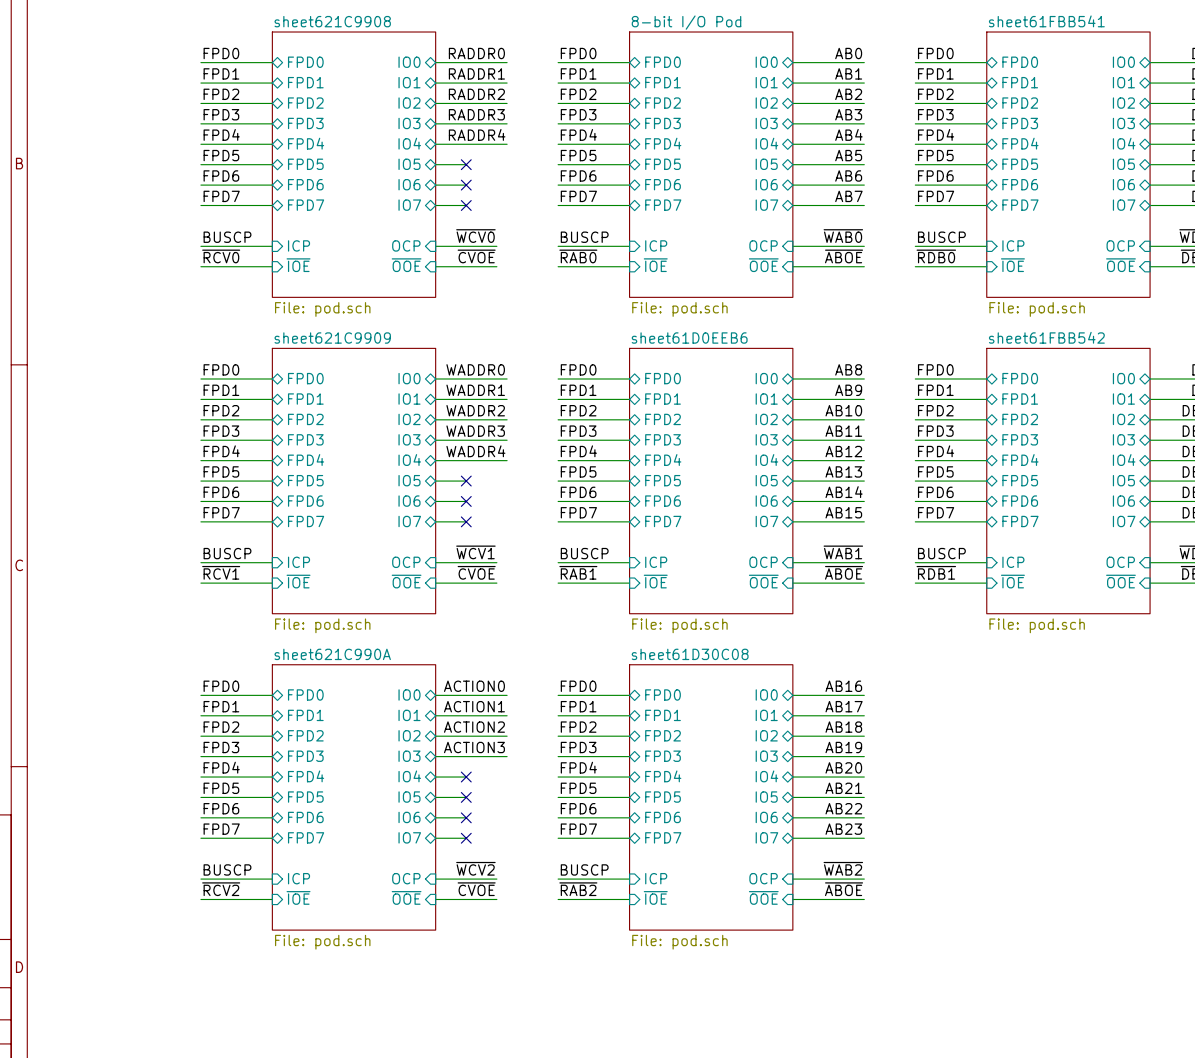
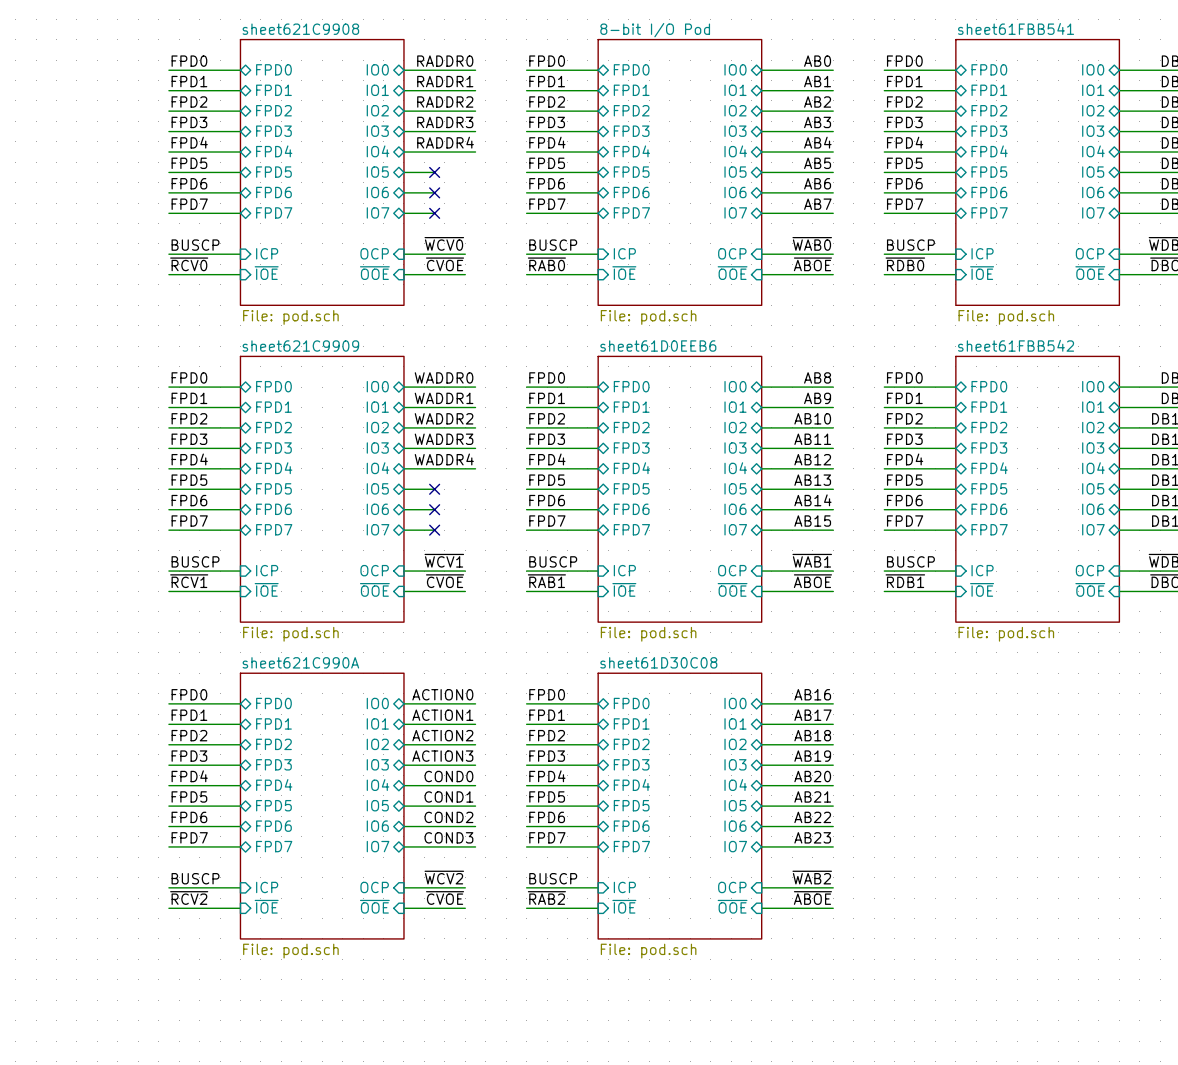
label: none -> COND0 (448, 776)
wire: none -> (434, 785) (475, 785)
no-connect mark: (466, 777) -> none
label: none -> COND1 (448, 796)
wire: none -> (434, 806) (475, 806)
no-connect mark: (466, 797) -> none
label: none -> COND2 (448, 817)
wire: none -> (434, 826) (475, 826)
no-connect mark: (466, 817) -> none
label: none -> COND3 (448, 837)
wire: none -> (434, 846) (475, 846)
no-connect mark: (466, 838) -> none

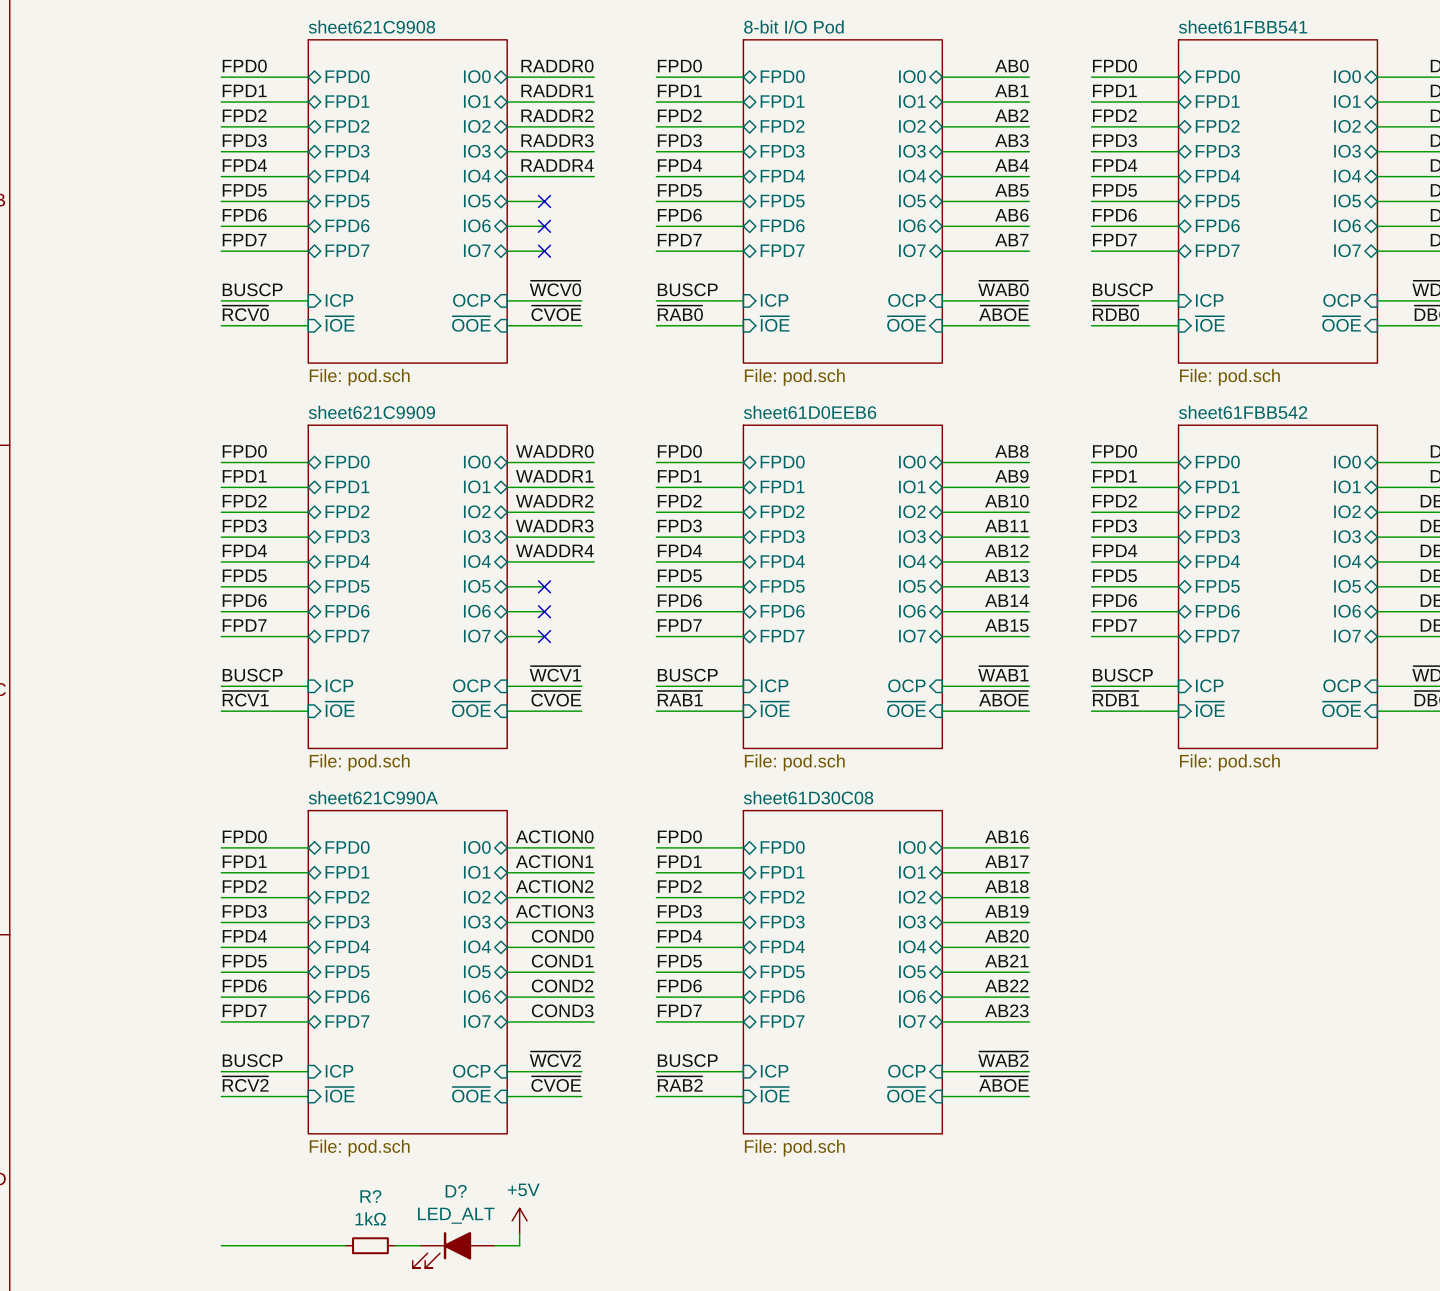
power symbol: none -> +5V (519, 1220)
wire: none -> (519, 1233) (519, 1245) (494, 1245)
wire: none -> (221, 1245) (345, 1245)
R?: none -> 1kΩ (370, 1245)
wire: none -> (395, 1245) (420, 1245)
D?: none -> LED_ALT (453, 1250)

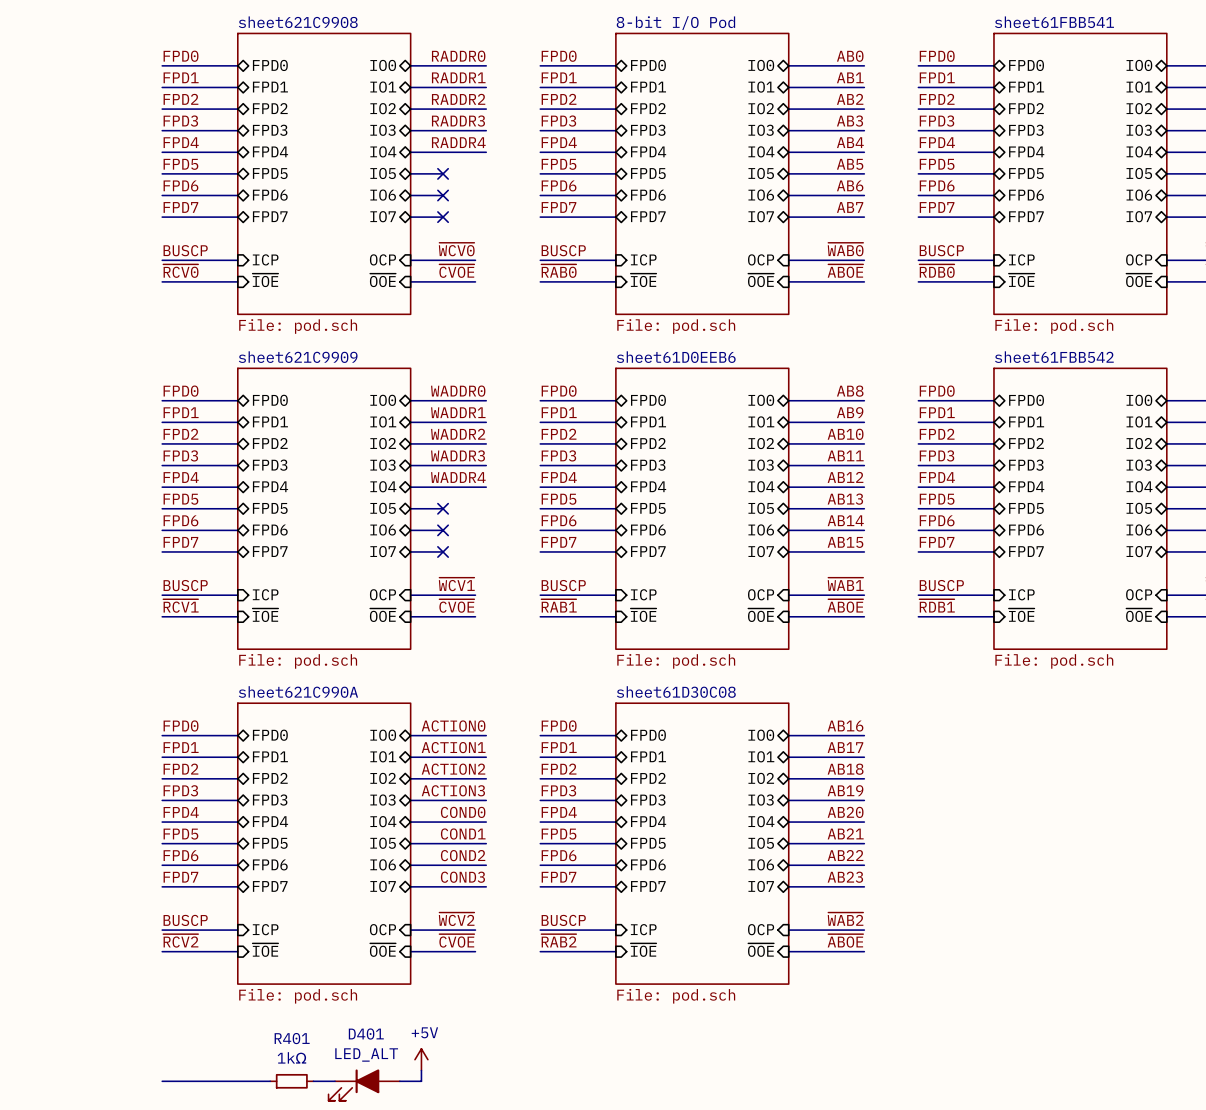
D? name: D? (456, 1191) -> D401 (366, 1034)
R? name: R? (370, 1196) -> R401 (292, 1038)

